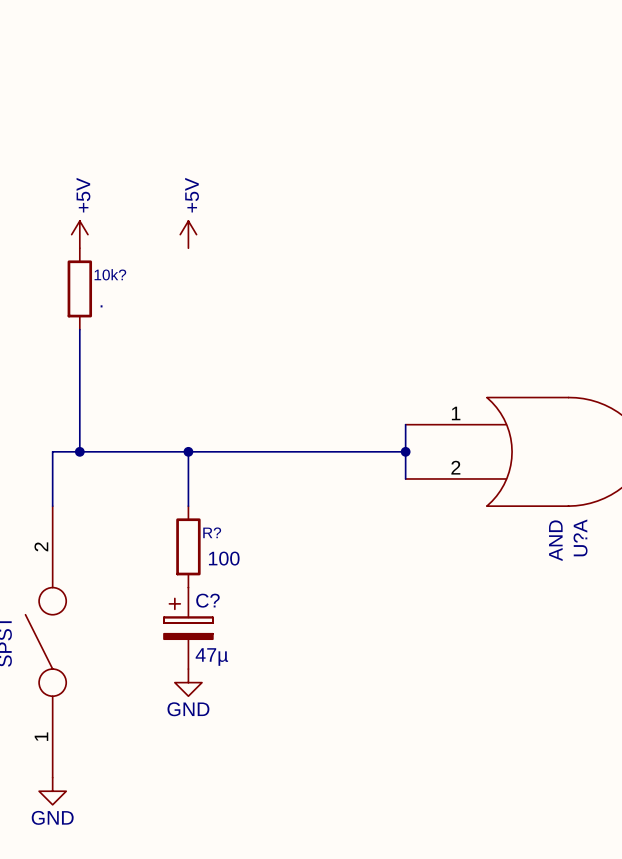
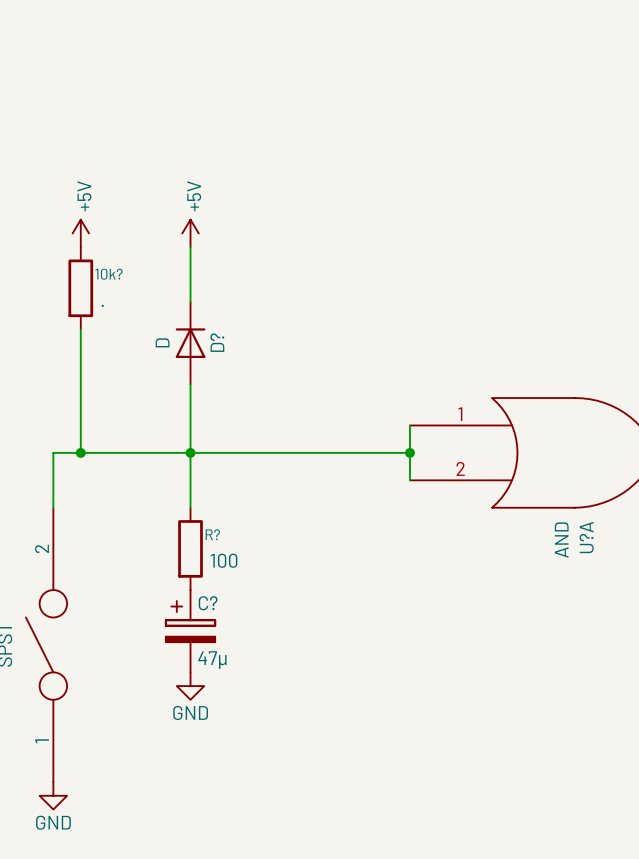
wire: none -> (190, 247) (190, 302)
D?: none -> D (190, 343)
wire: none -> (190, 384) (190, 452)

